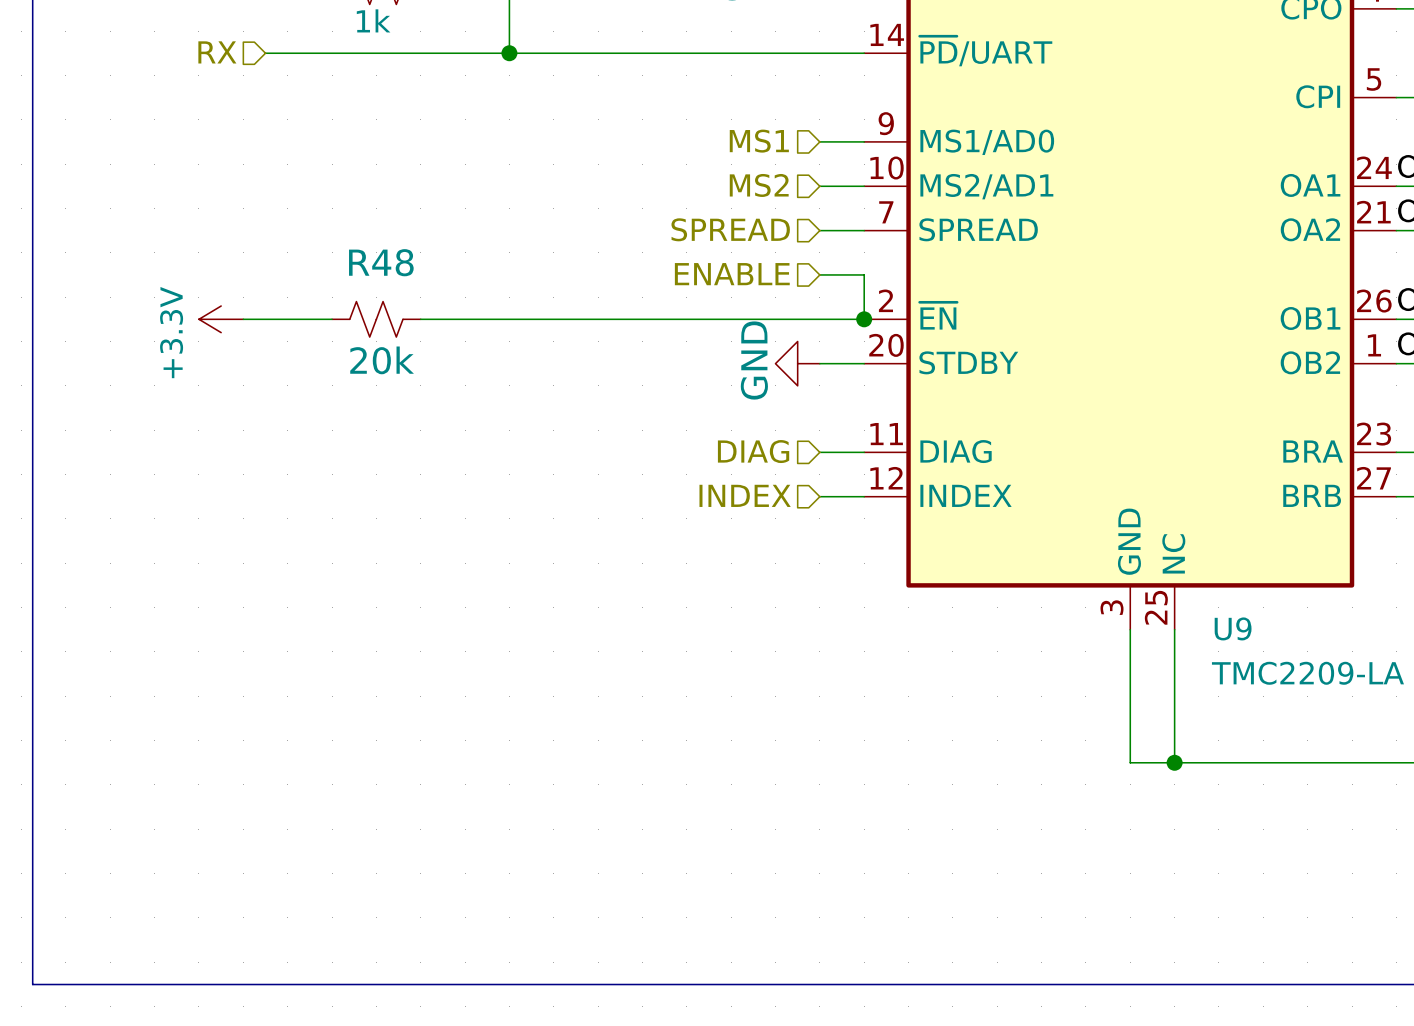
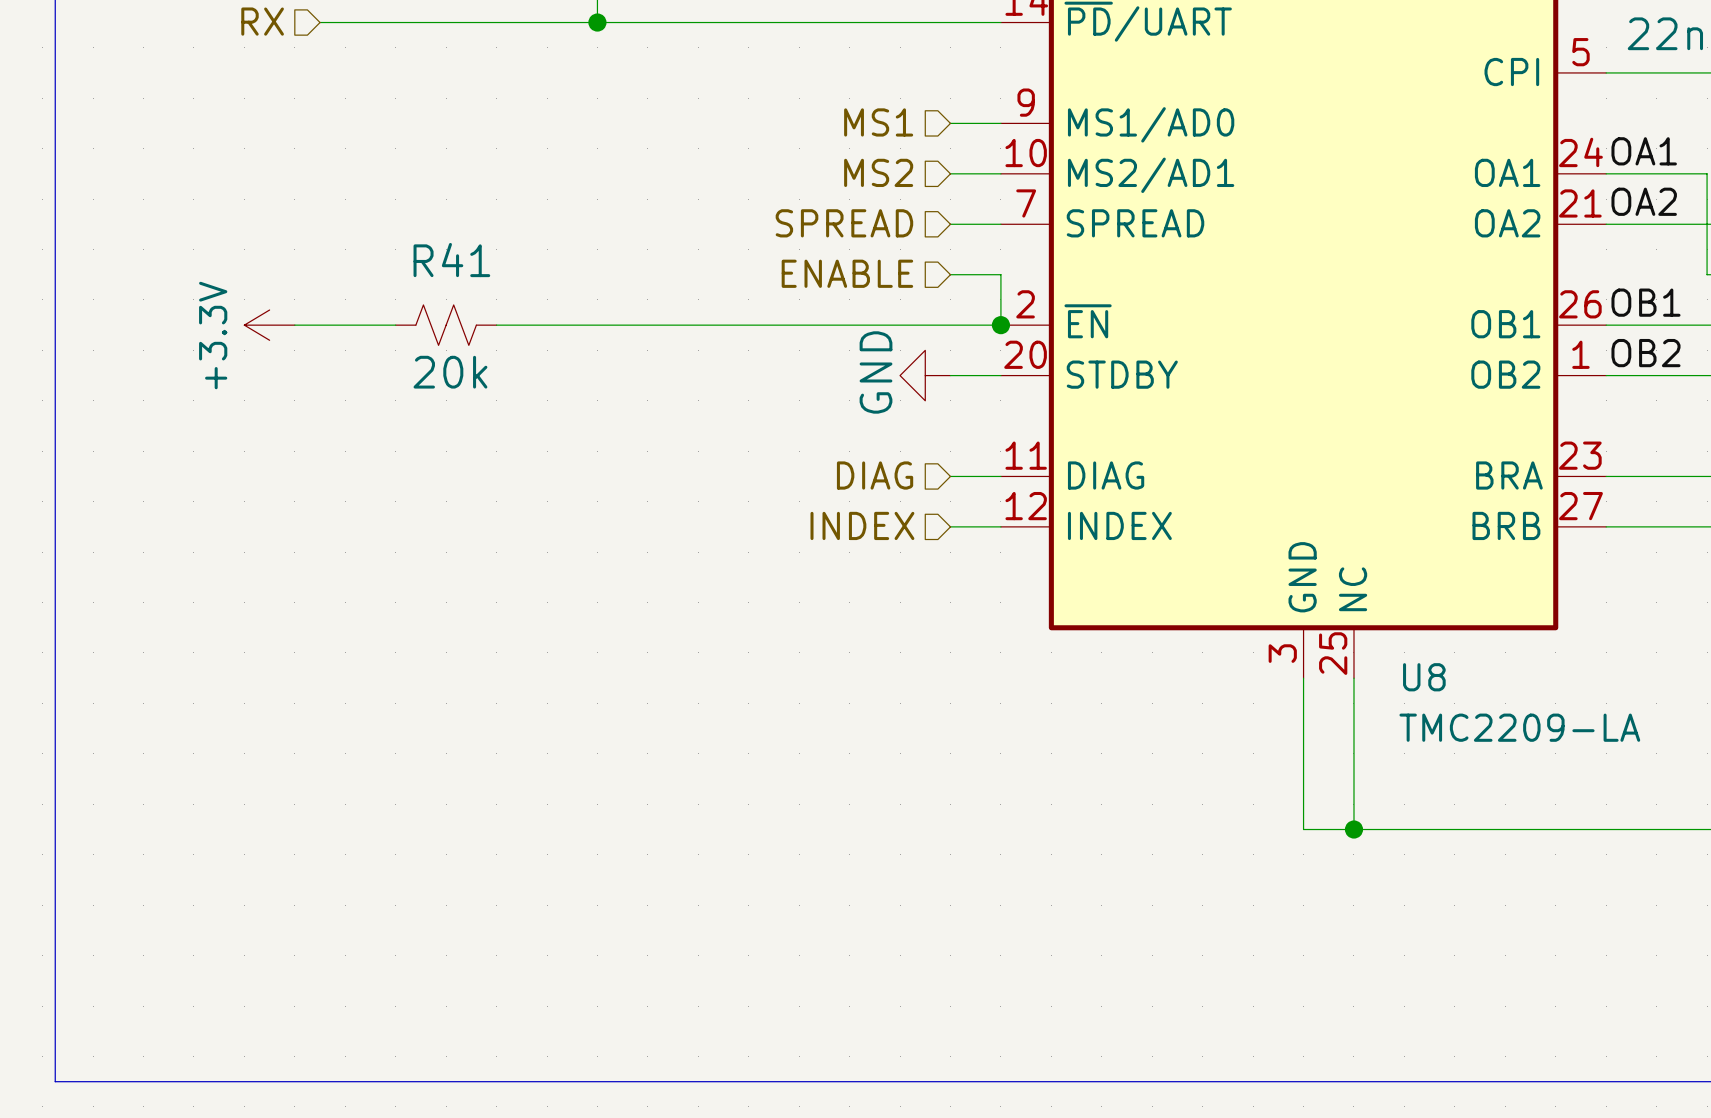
R48 name: R48 (381, 262) -> R41 (451, 260)
U9 name: U9 (1233, 628) -> U8 (1424, 677)

